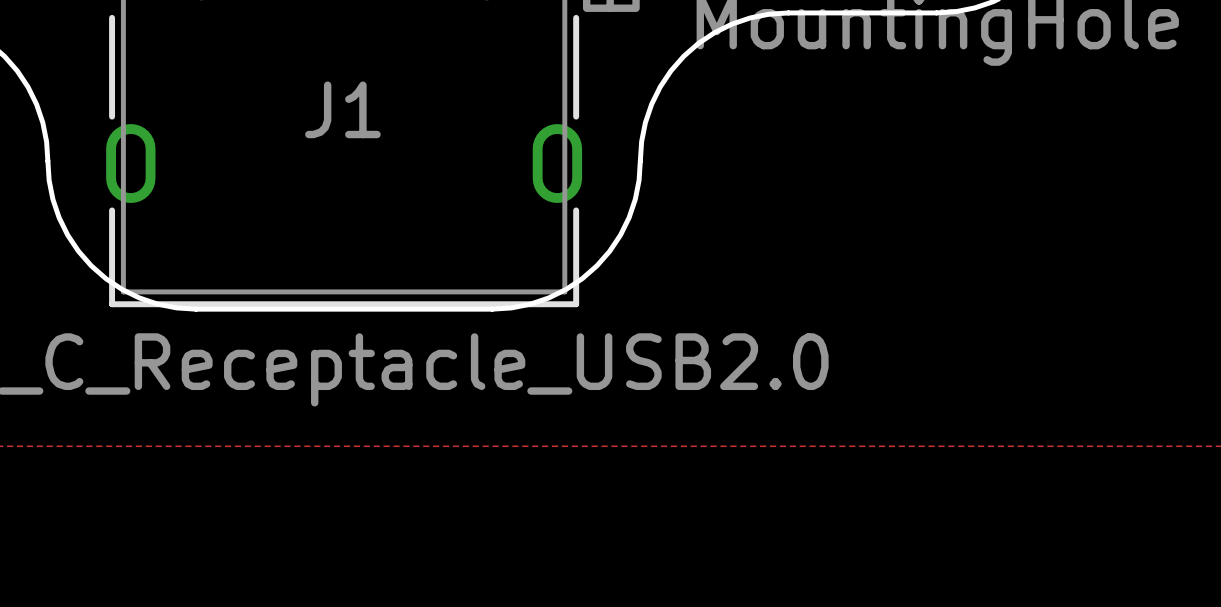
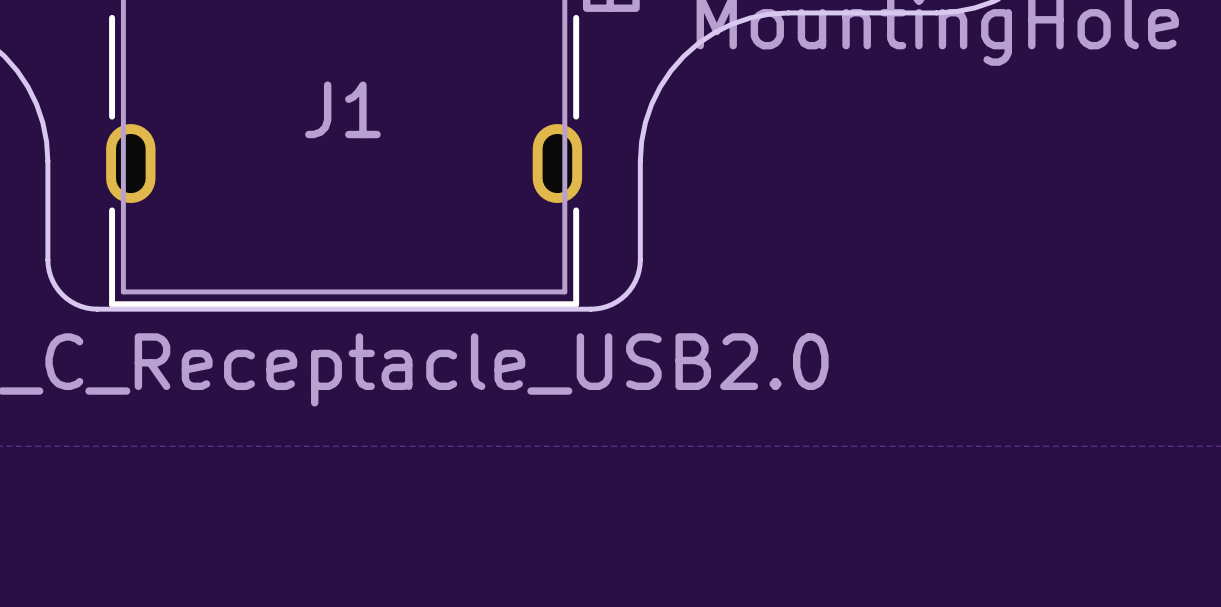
board edge: (47, 161) (49, 180) (59, 217) (78, 251) (91, 265) (105, 278) (139, 297) (157, 304) (195, 309) -> (47, 161) (48, 265) (52, 281) (62, 294) (75, 304) (91, 308) (195, 309)
board edge: (640, 161) (635, 199) (629, 217) (609, 251) (596, 265) (566, 289) (548, 297) (530, 304) (492, 309) -> (640, 161) (640, 265) (635, 281) (625, 294) (612, 304) (596, 308) (492, 309)

